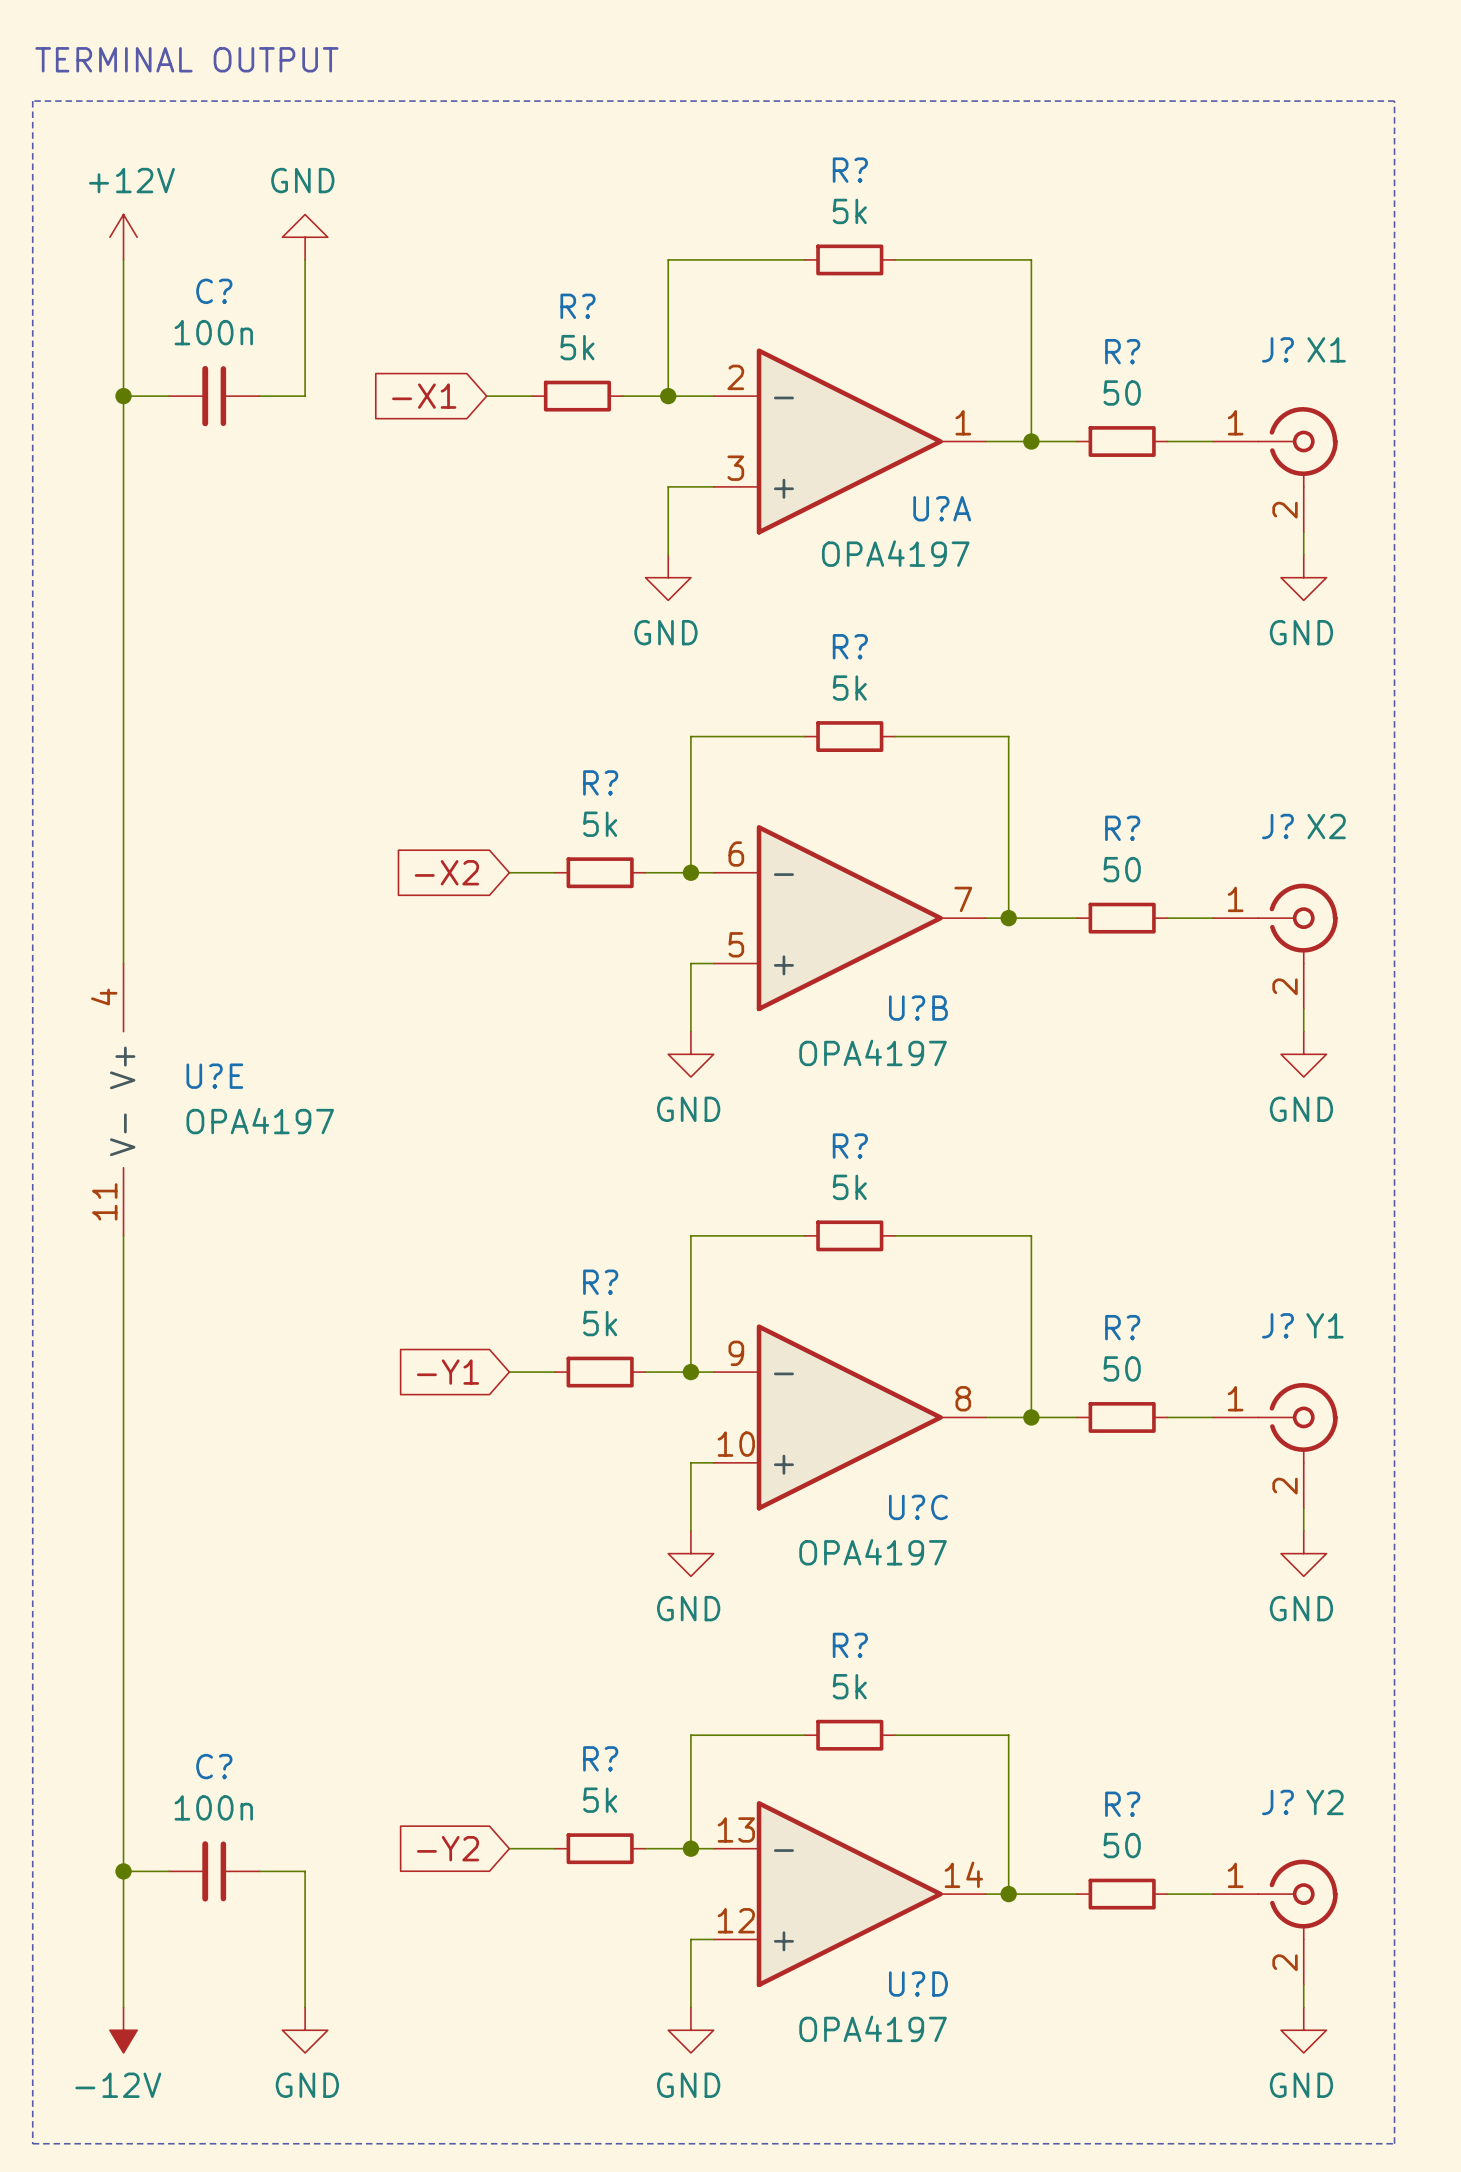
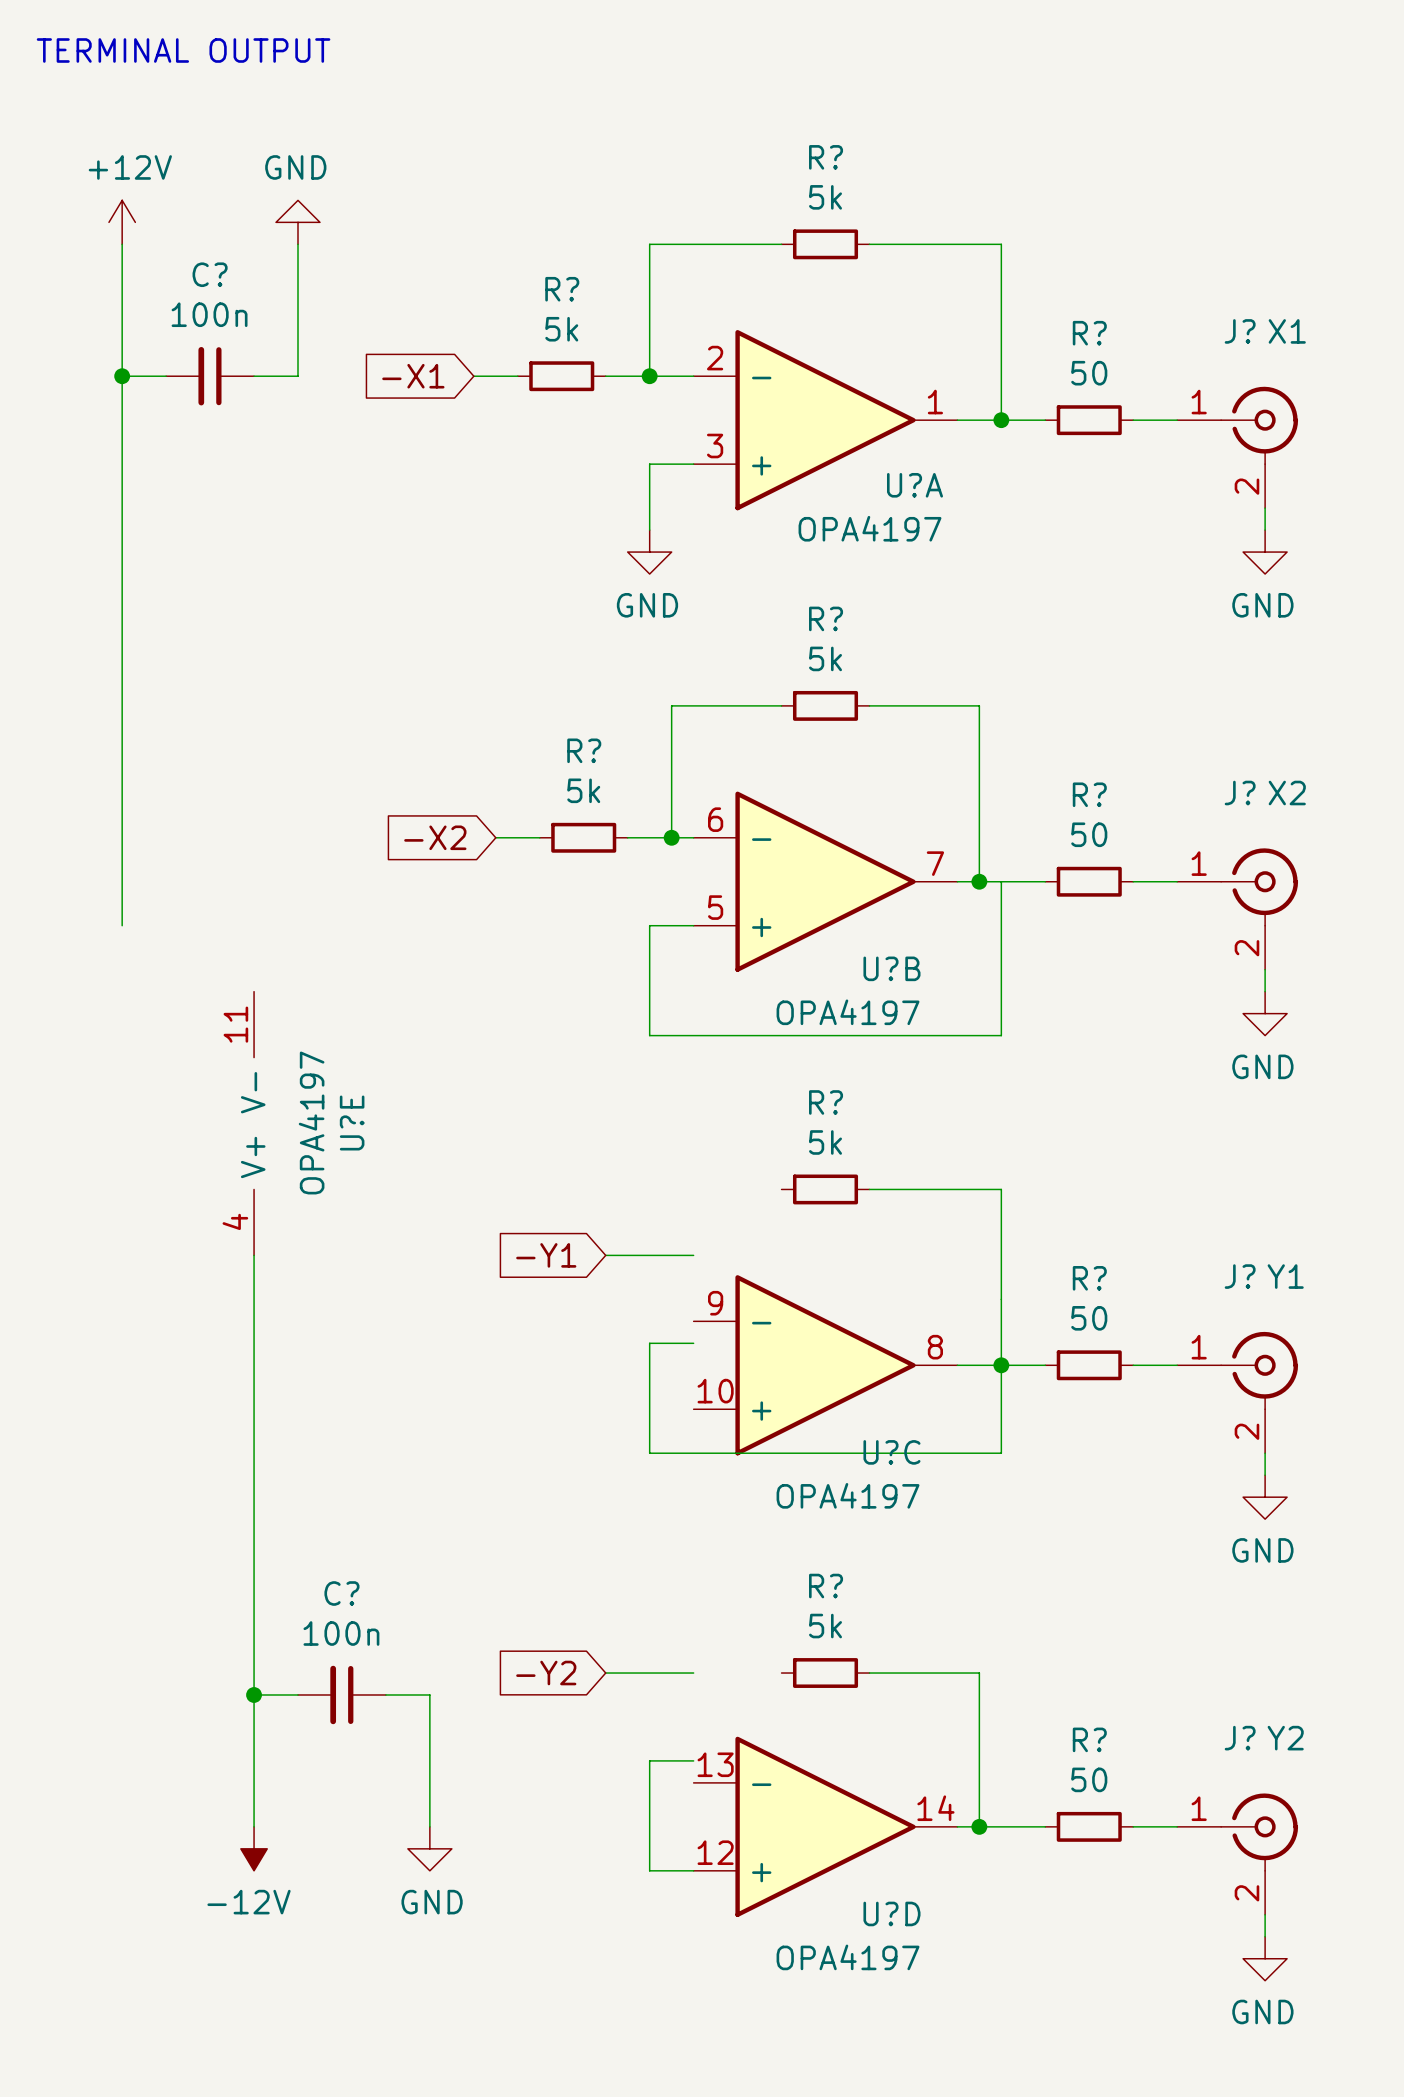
line: (32, 101) (32, 2143) (1394, 2143) (1394, 101) (32, 101) -> none
wire: (690, 963) (690, 1031) -> (671, 925) (649, 925) (649, 1035) (1001, 1035) (1001, 881)
power symbol: GND (690, 1054) -> none
U?E rotation: 0° (123, 1099) -> 180° (254, 1123)
U?E value position: OPA4197 (260, 1121) -> OPA4197 (311, 1123)
wire: (123, 1235) (123, 2007) -> none
wire: (804, 1235) (690, 1235) (690, 1372) -> none
wire: none -> (254, 1255) (254, 1826)
global label position: -Y1 (447, 1372) -> -Y1 (546, 1255)
wire: (509, 1372) (554, 1372) -> none
R?: 5k (600, 1372) -> none
wire: (645, 1372) (713, 1372) -> none
junction: (690, 1372) -> none
wire: none -> (693, 1343) (649, 1343) (649, 1453) (1001, 1453) (1001, 1365)
wire: (713, 1462) (690, 1462) (690, 1530) -> none
power symbol: GND (690, 1553) -> none
wire: (690, 1735) (690, 1848) -> (671, 1673) (605, 1673)
wire: (713, 1735) (804, 1735) -> (605, 1255) (693, 1255)
junction: none -> (254, 1694)
global label position: -Y2 (447, 1848) -> -Y2 (546, 1673)
wire: (509, 1848) (554, 1848) -> none
R?: 5k (600, 1848) -> none
wire: (645, 1848) (713, 1848) -> none
junction: (690, 1848) -> none
wire: (123, 1871) (168, 1871) -> (254, 1694) (298, 1694)
junction: (123, 1871) -> none
C? position: (214, 1871) -> (341, 1694)
wire: (259, 1871) (305, 1871) (305, 2007) -> (385, 1694) (429, 1694) (429, 1826)
power symbol: none -> GND (429, 1848)
wire: (690, 1939) (690, 2007) -> (671, 1870) (649, 1870) (649, 1760) (693, 1760)
power symbol position: -12V (123, 2030) -> -12V (254, 1848)
power symbol: GND (305, 2030) -> none
power symbol: GND (690, 2030) -> none

